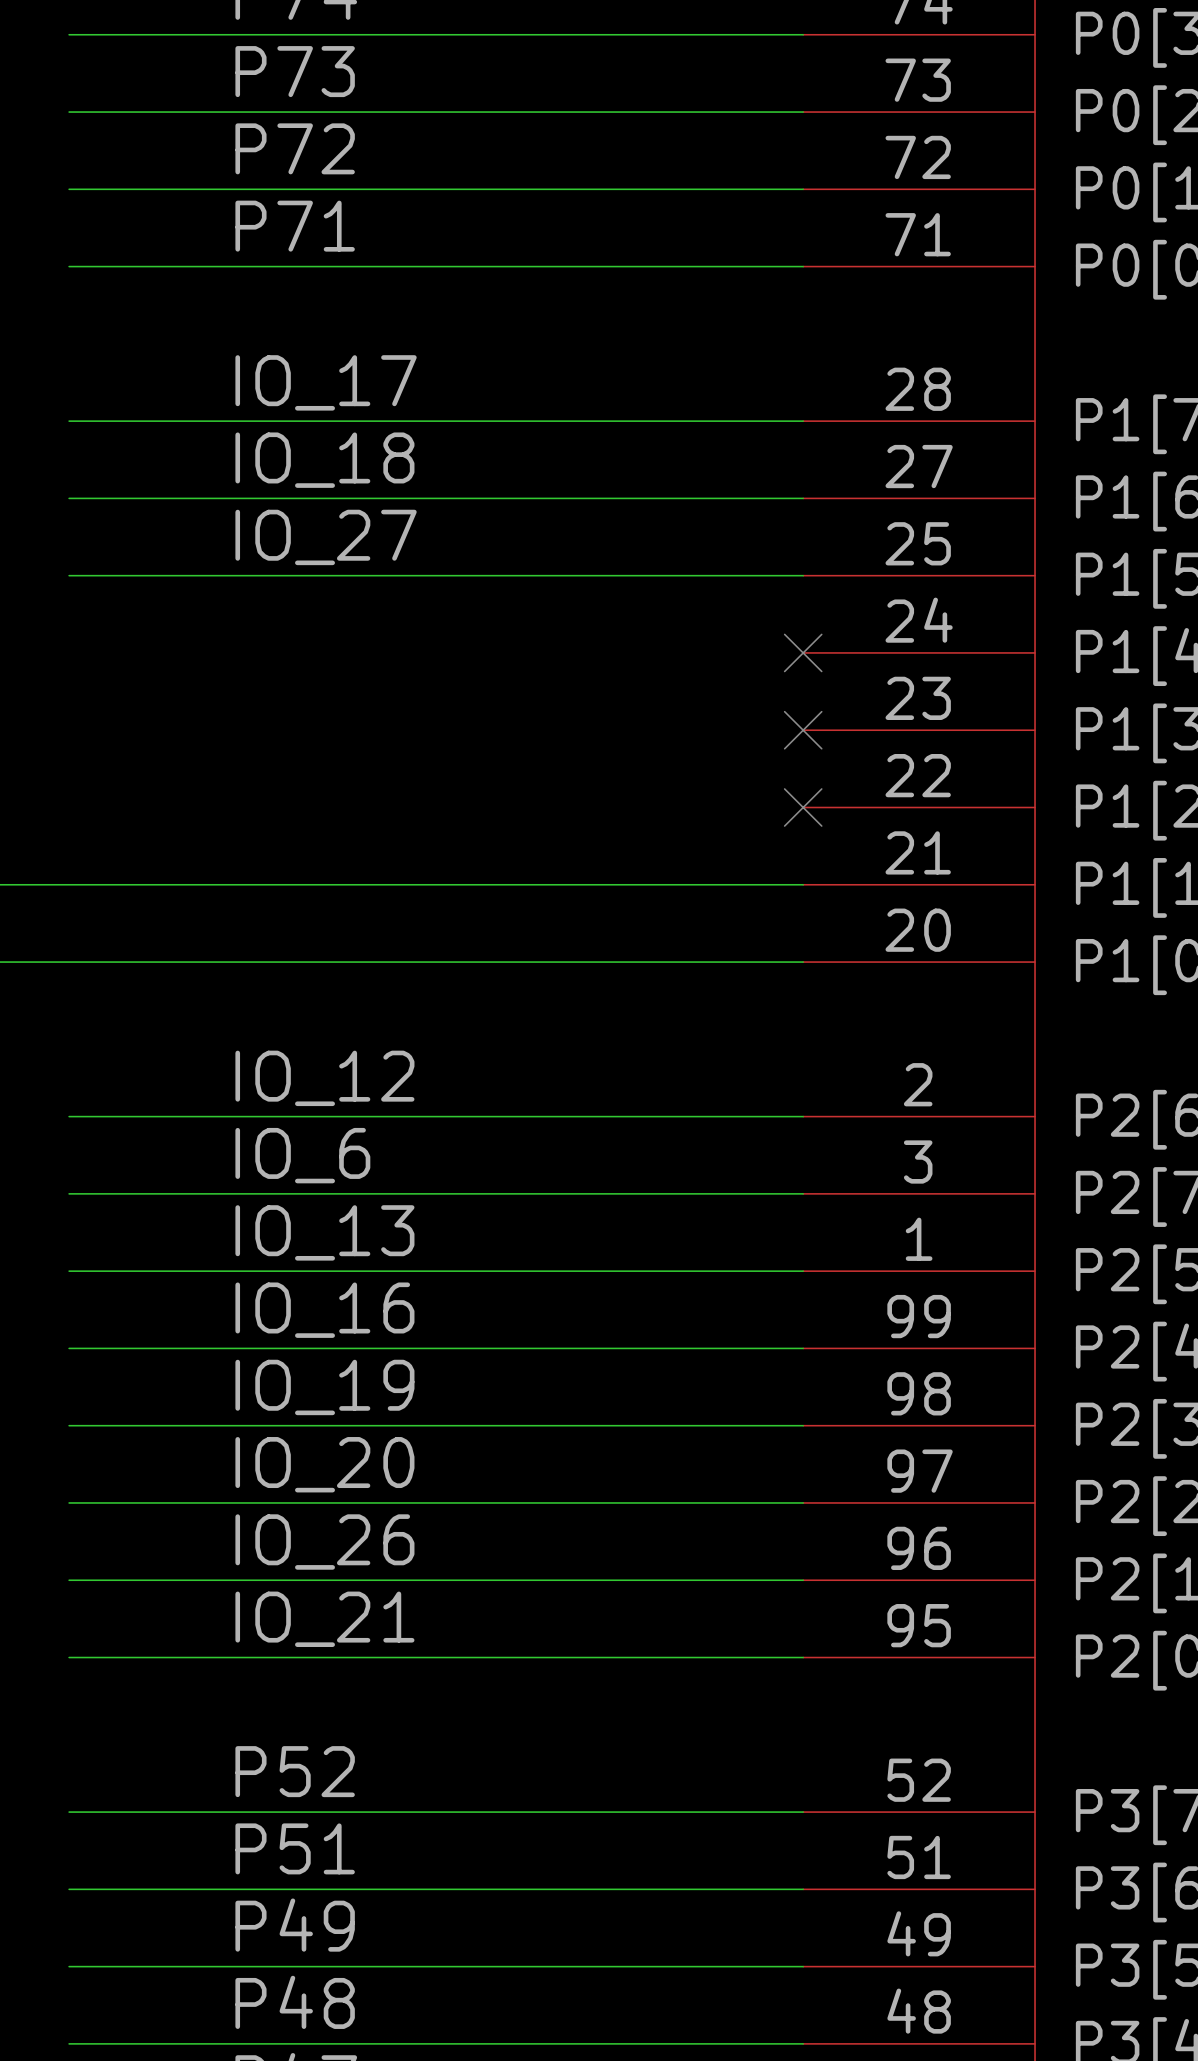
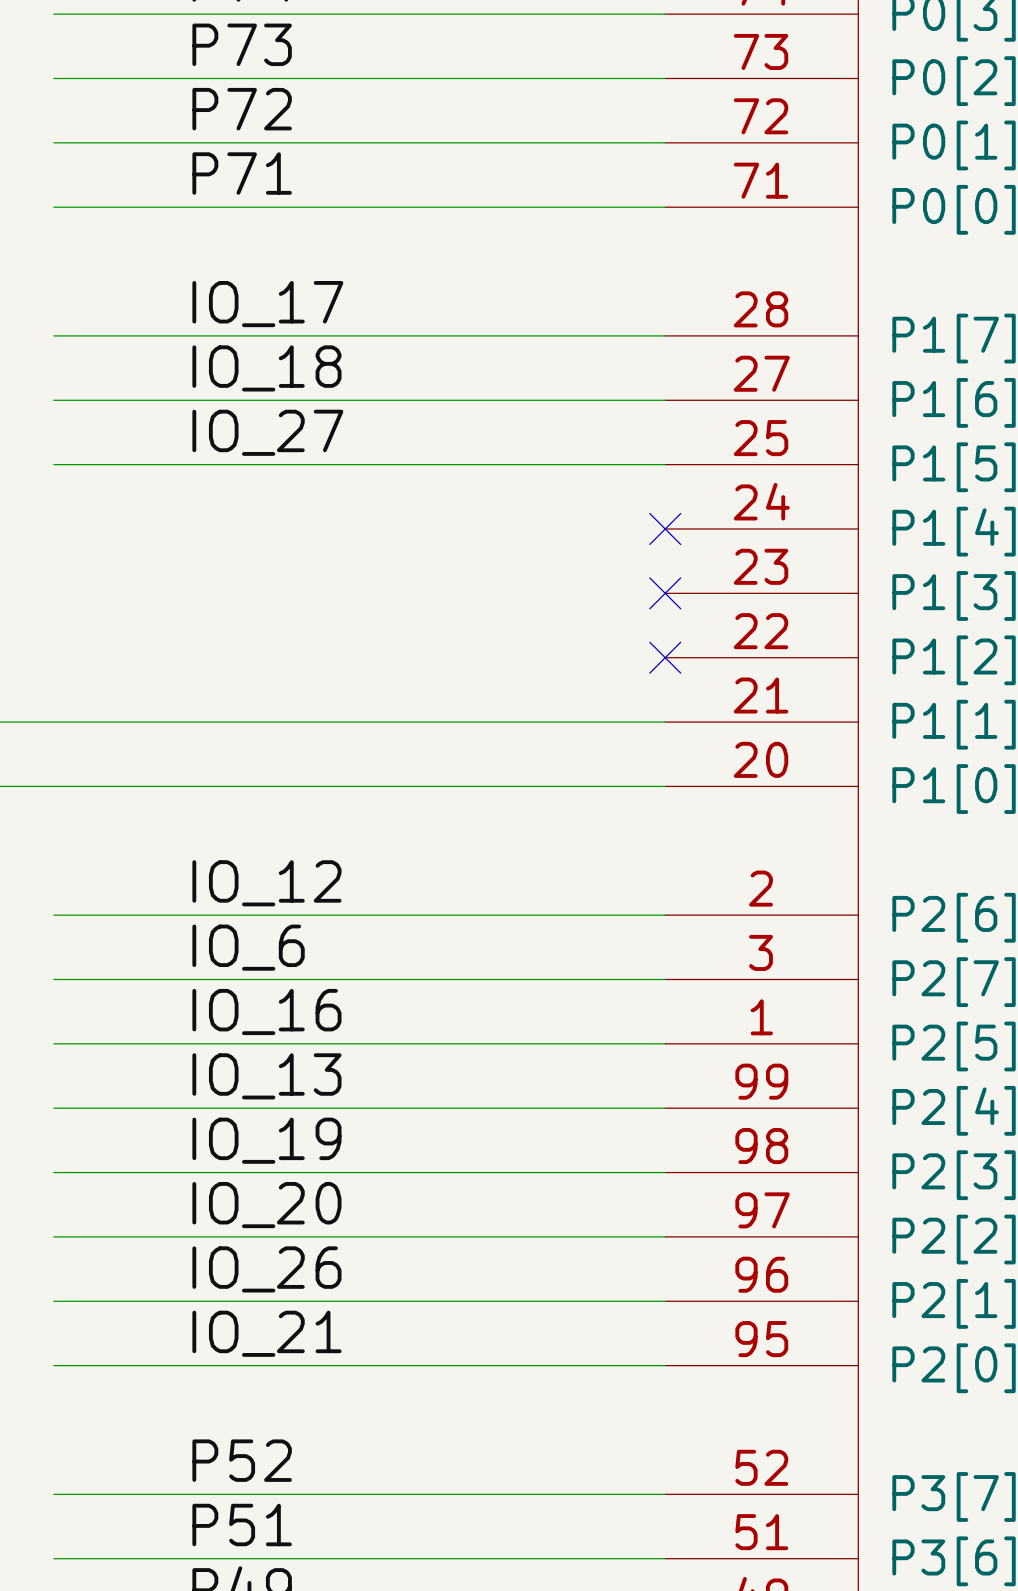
label: IO_13 (324, 1232) -> IO_16 (266, 1012)
label: IO_16 (324, 1310) -> IO_13 (266, 1076)

